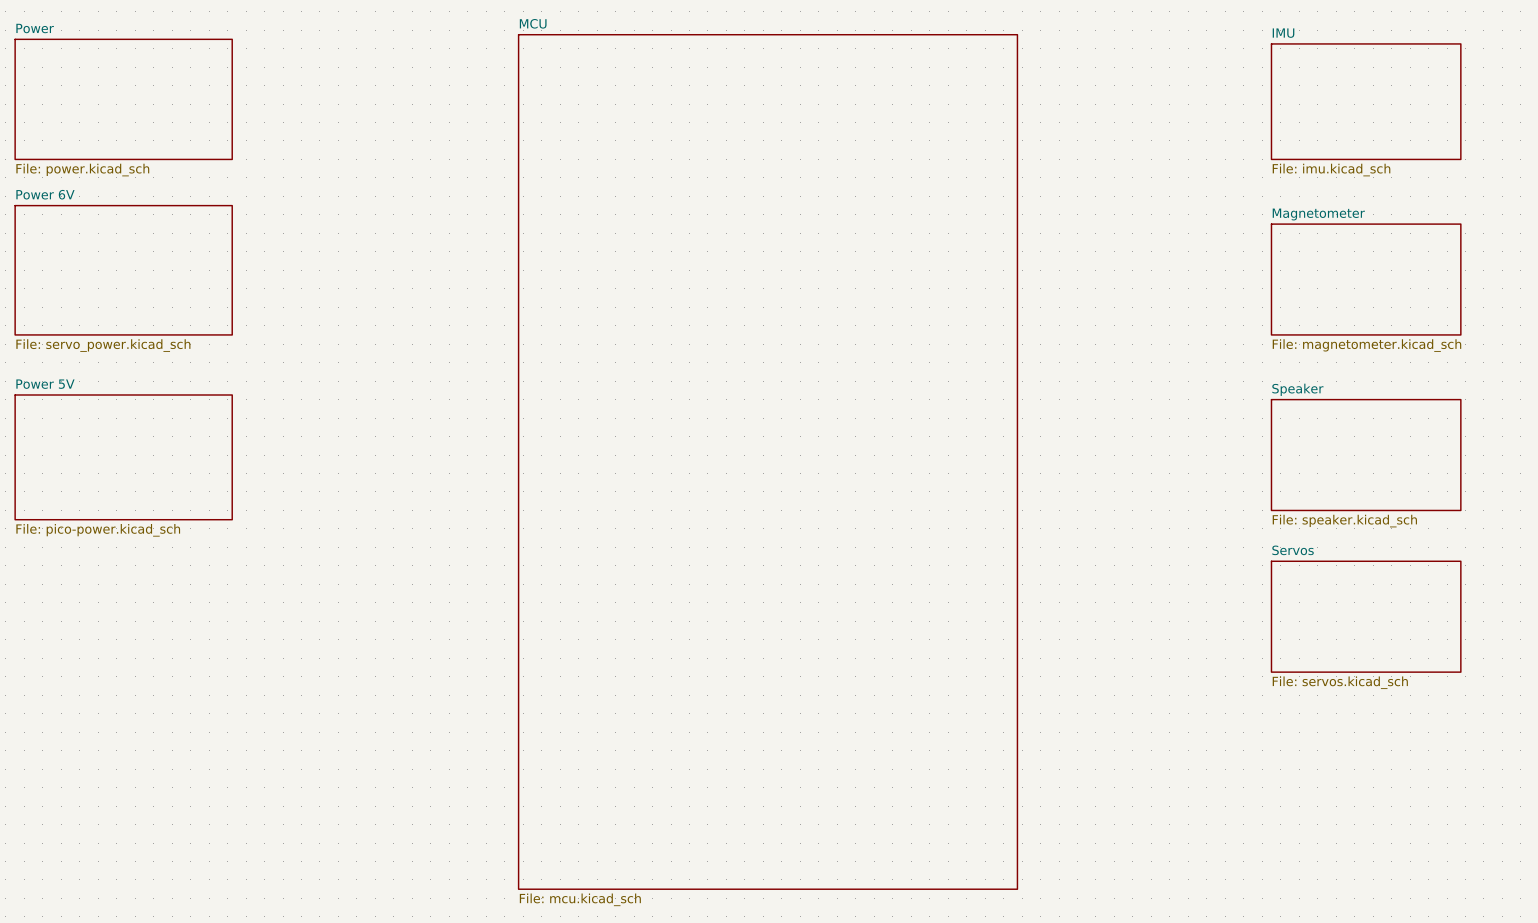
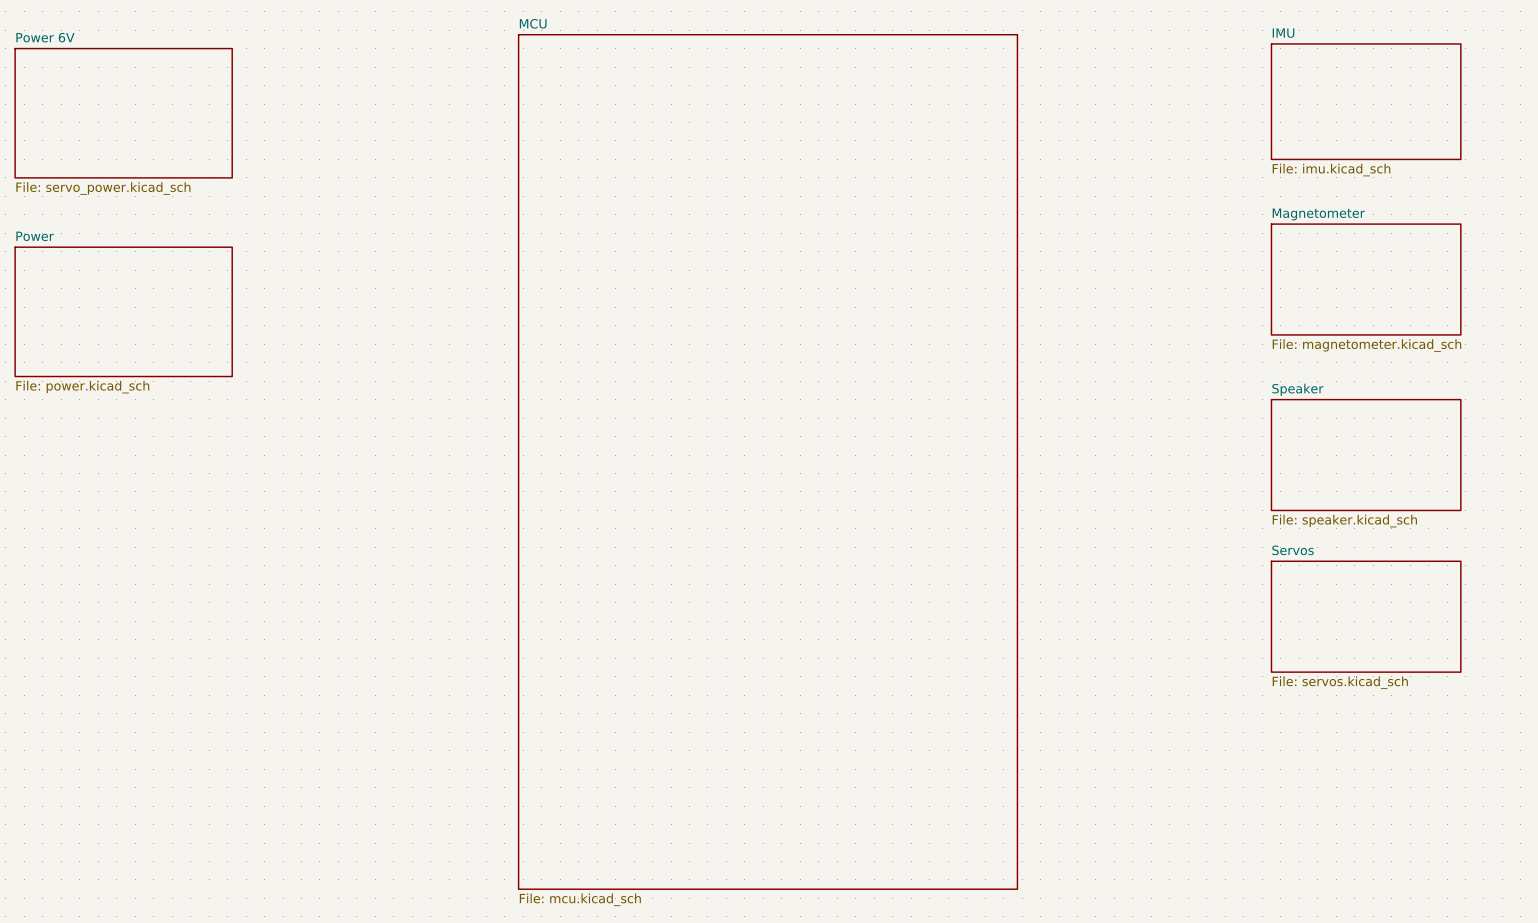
sheet Power: File: power.kicad_sch (123, 99) -> none
sheet Power 6V position: (123, 270) -> (123, 113)
sheet Power: none -> File: power.kicad_sch (123, 311)
sheet Power 5V: File: pico-power.kicad_sch (123, 457) -> none

